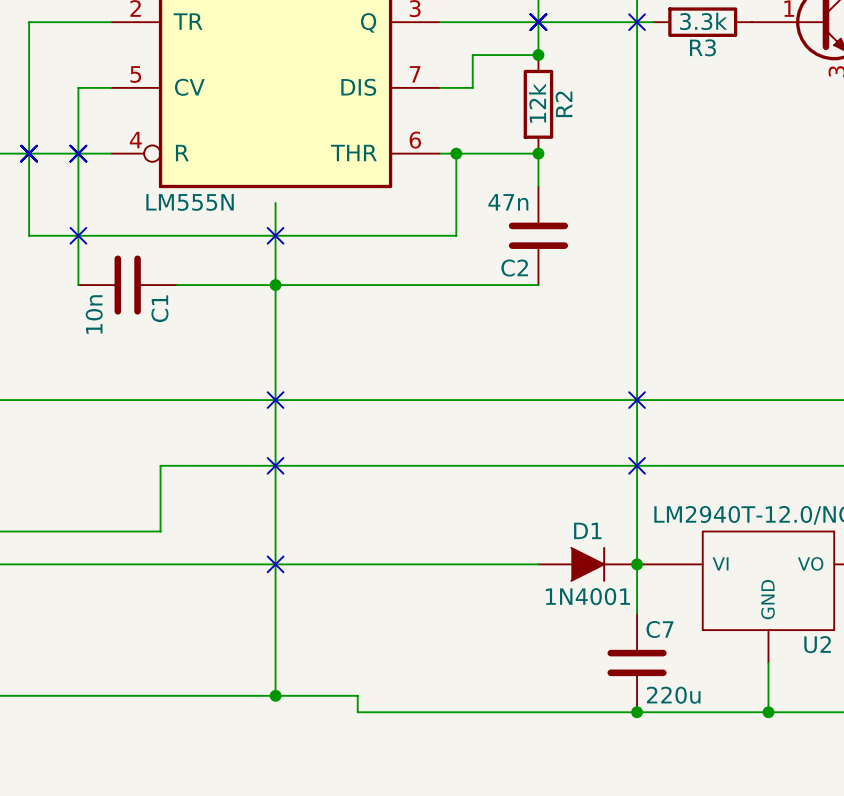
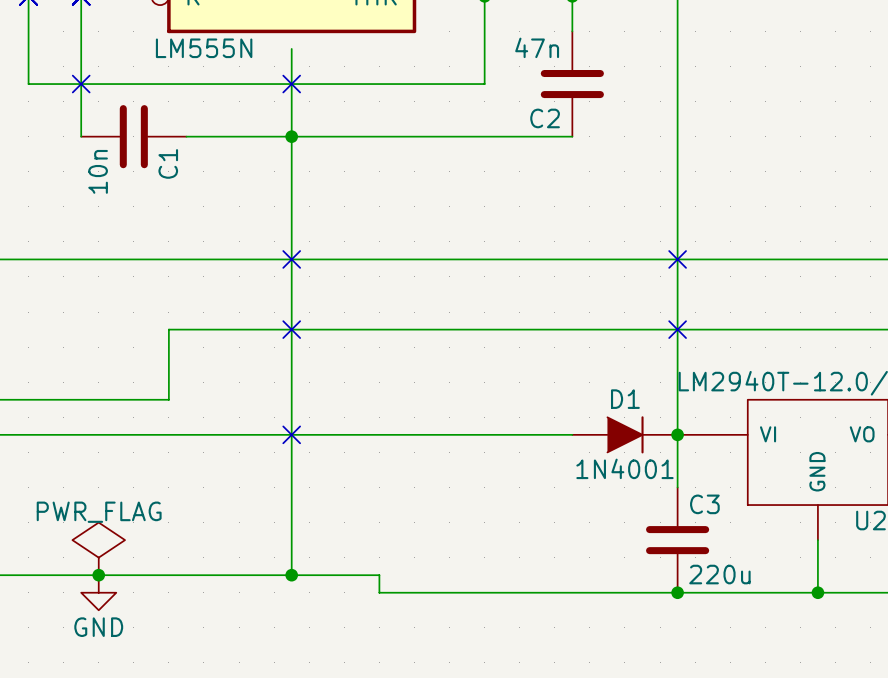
C7 name: C7 (659, 629) -> C3 (704, 504)
power symbol: none -> PWR_FLAG (98, 548)
junction: none -> (98, 575)
power symbol: none -> GND (98, 592)

